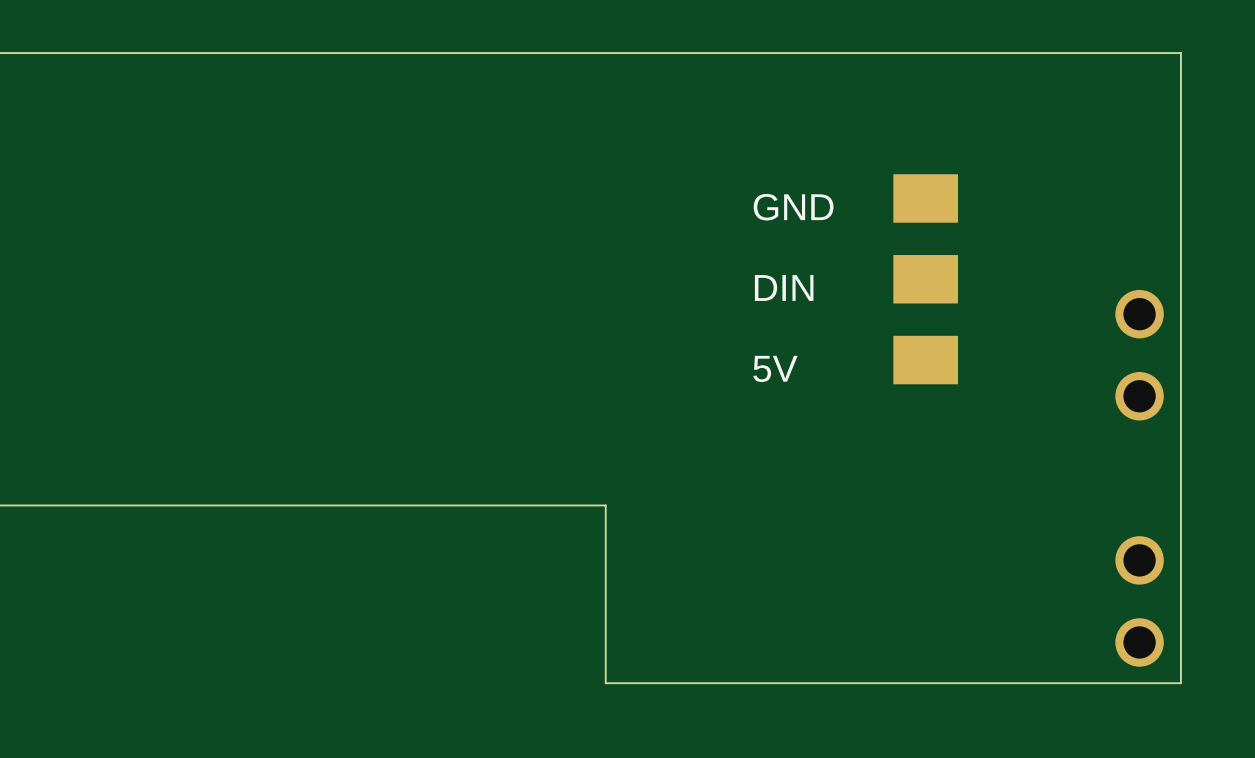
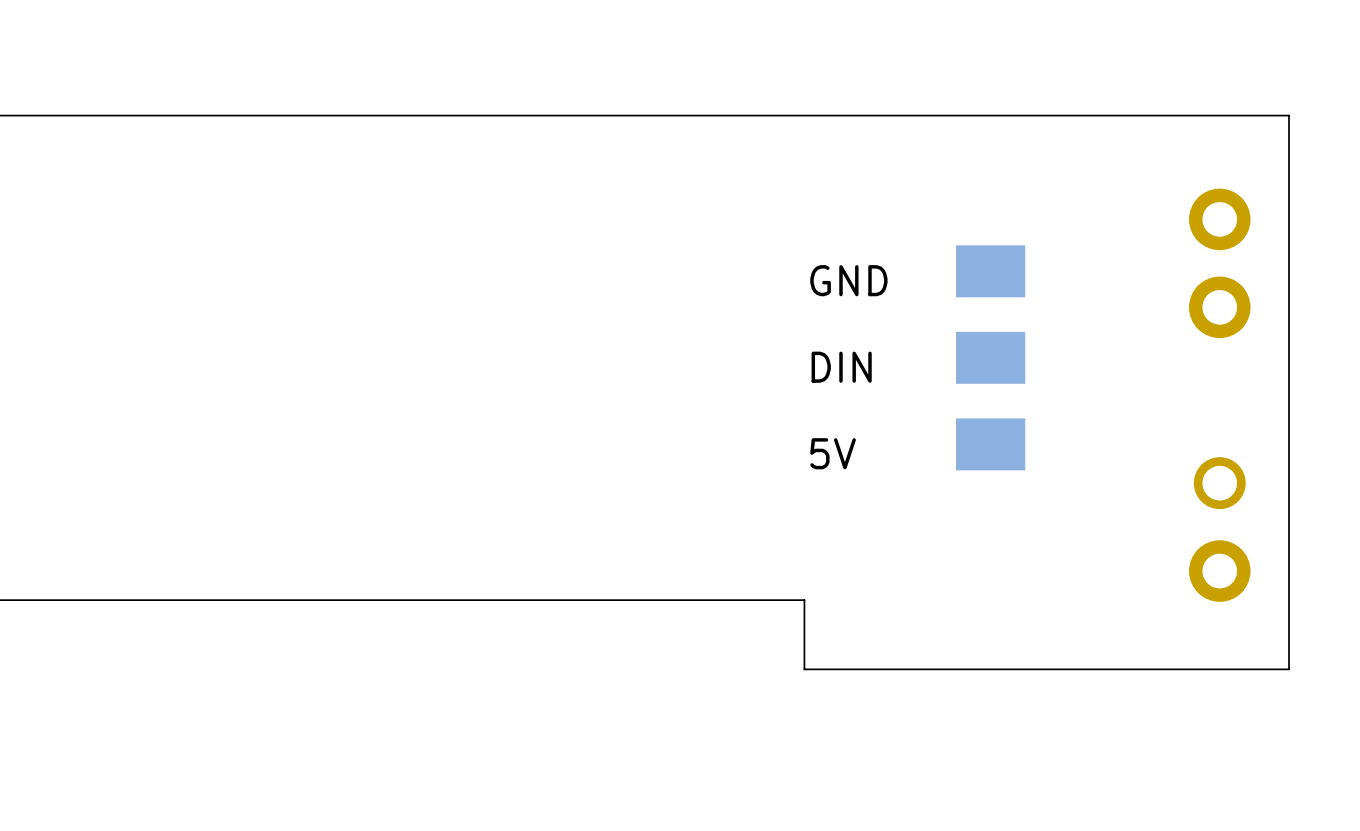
board edge: (1180, 53) (1180, 683) (605, 683) (605, 505) -> (1264, 115) (1289, 115) (1289, 669) (804, 669) (804, 600) (647, 600)
part: none -> (1219, 219)
part: none -> (1219, 307)
part: (1139, 314) -> none
part: none -> (1219, 571)
part: (1139, 560) -> none
part: (1139, 642) -> none

